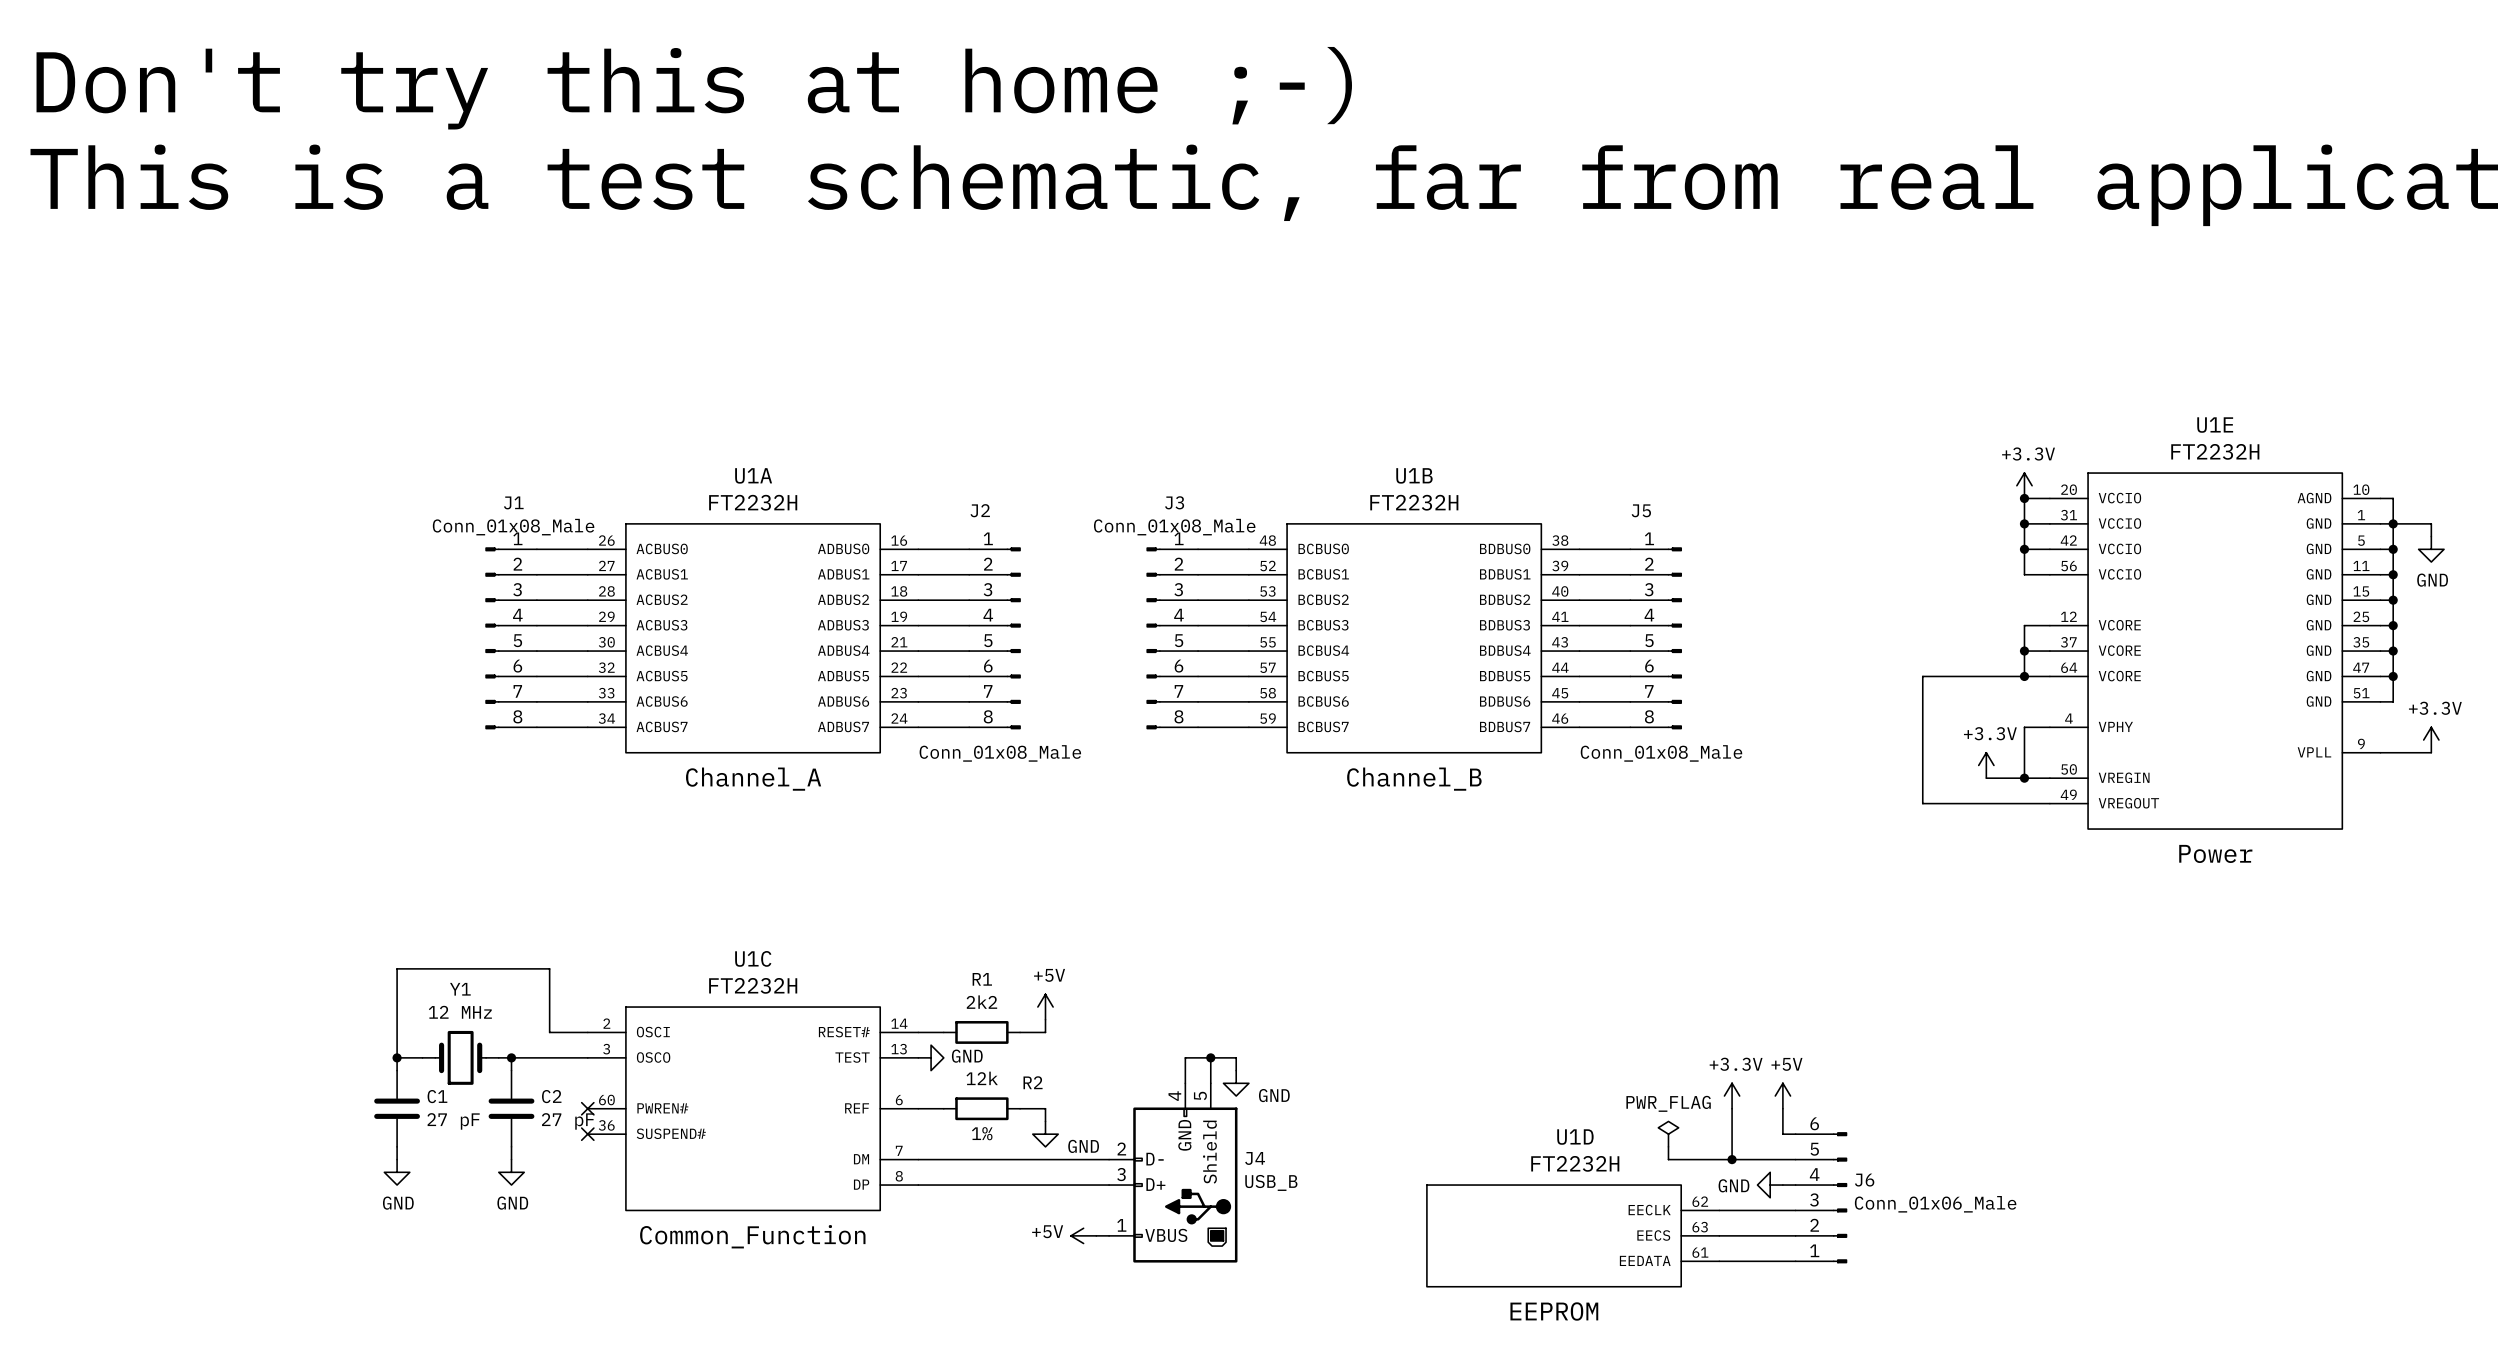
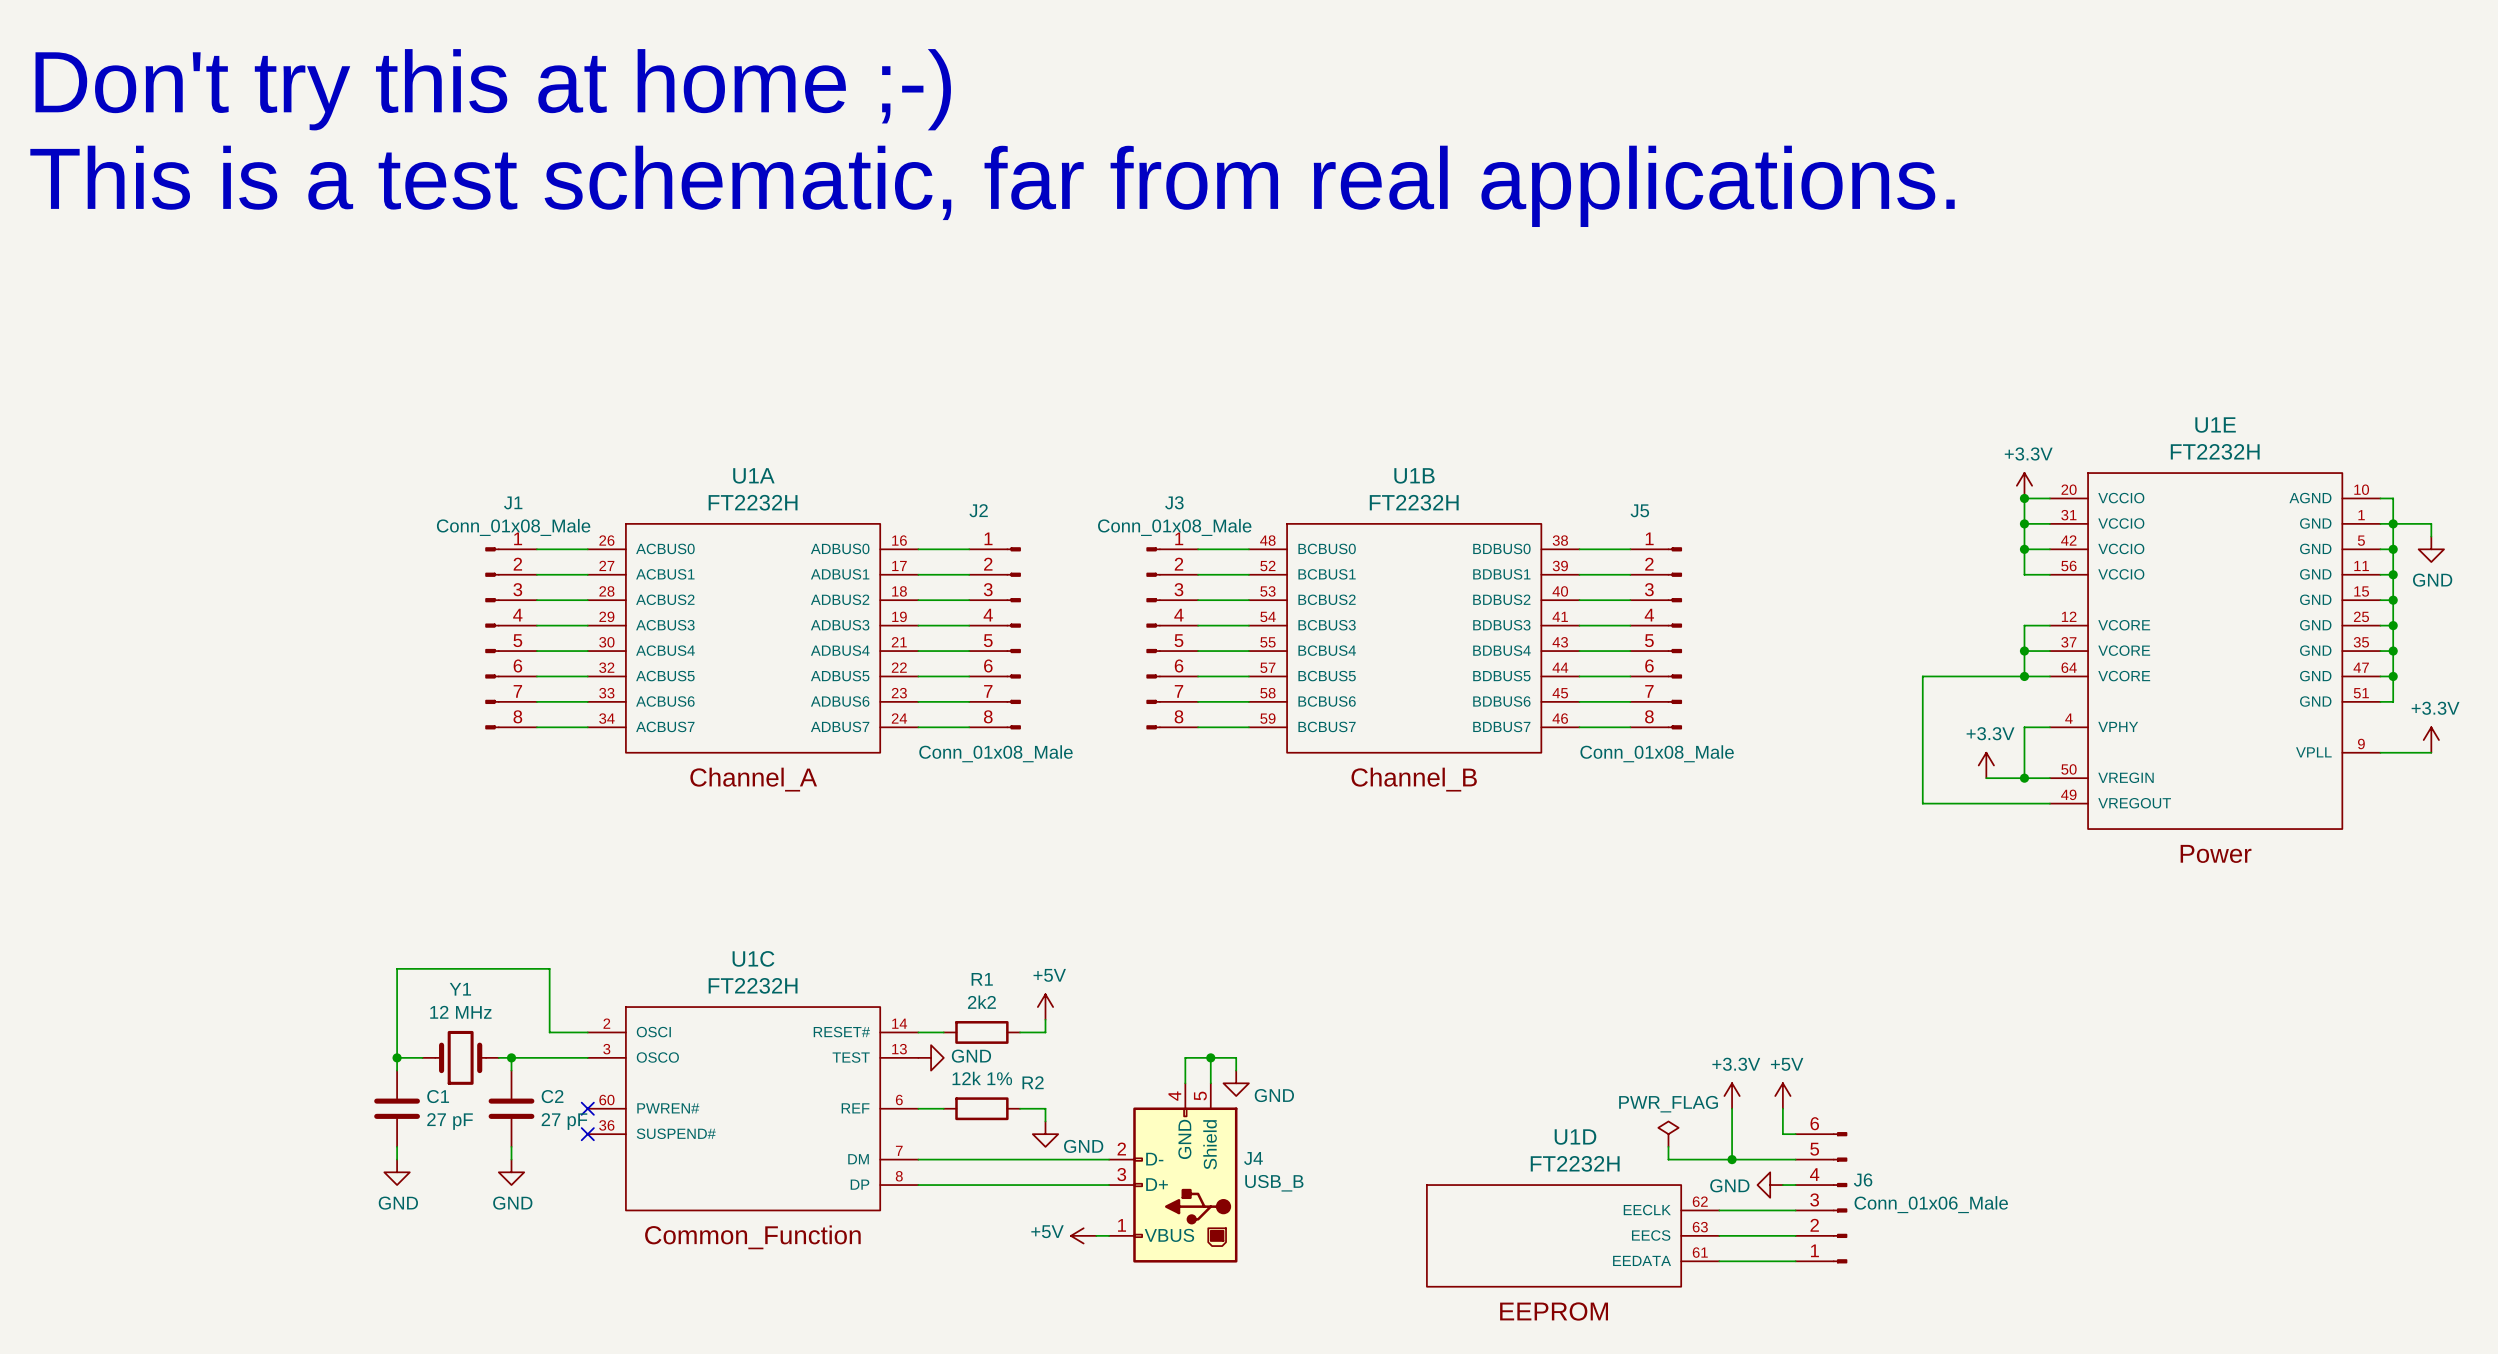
R2 value: 12k (982, 1078) -> 12k 1% (982, 1078)
R2 text: 1% (982, 1133) -> none

